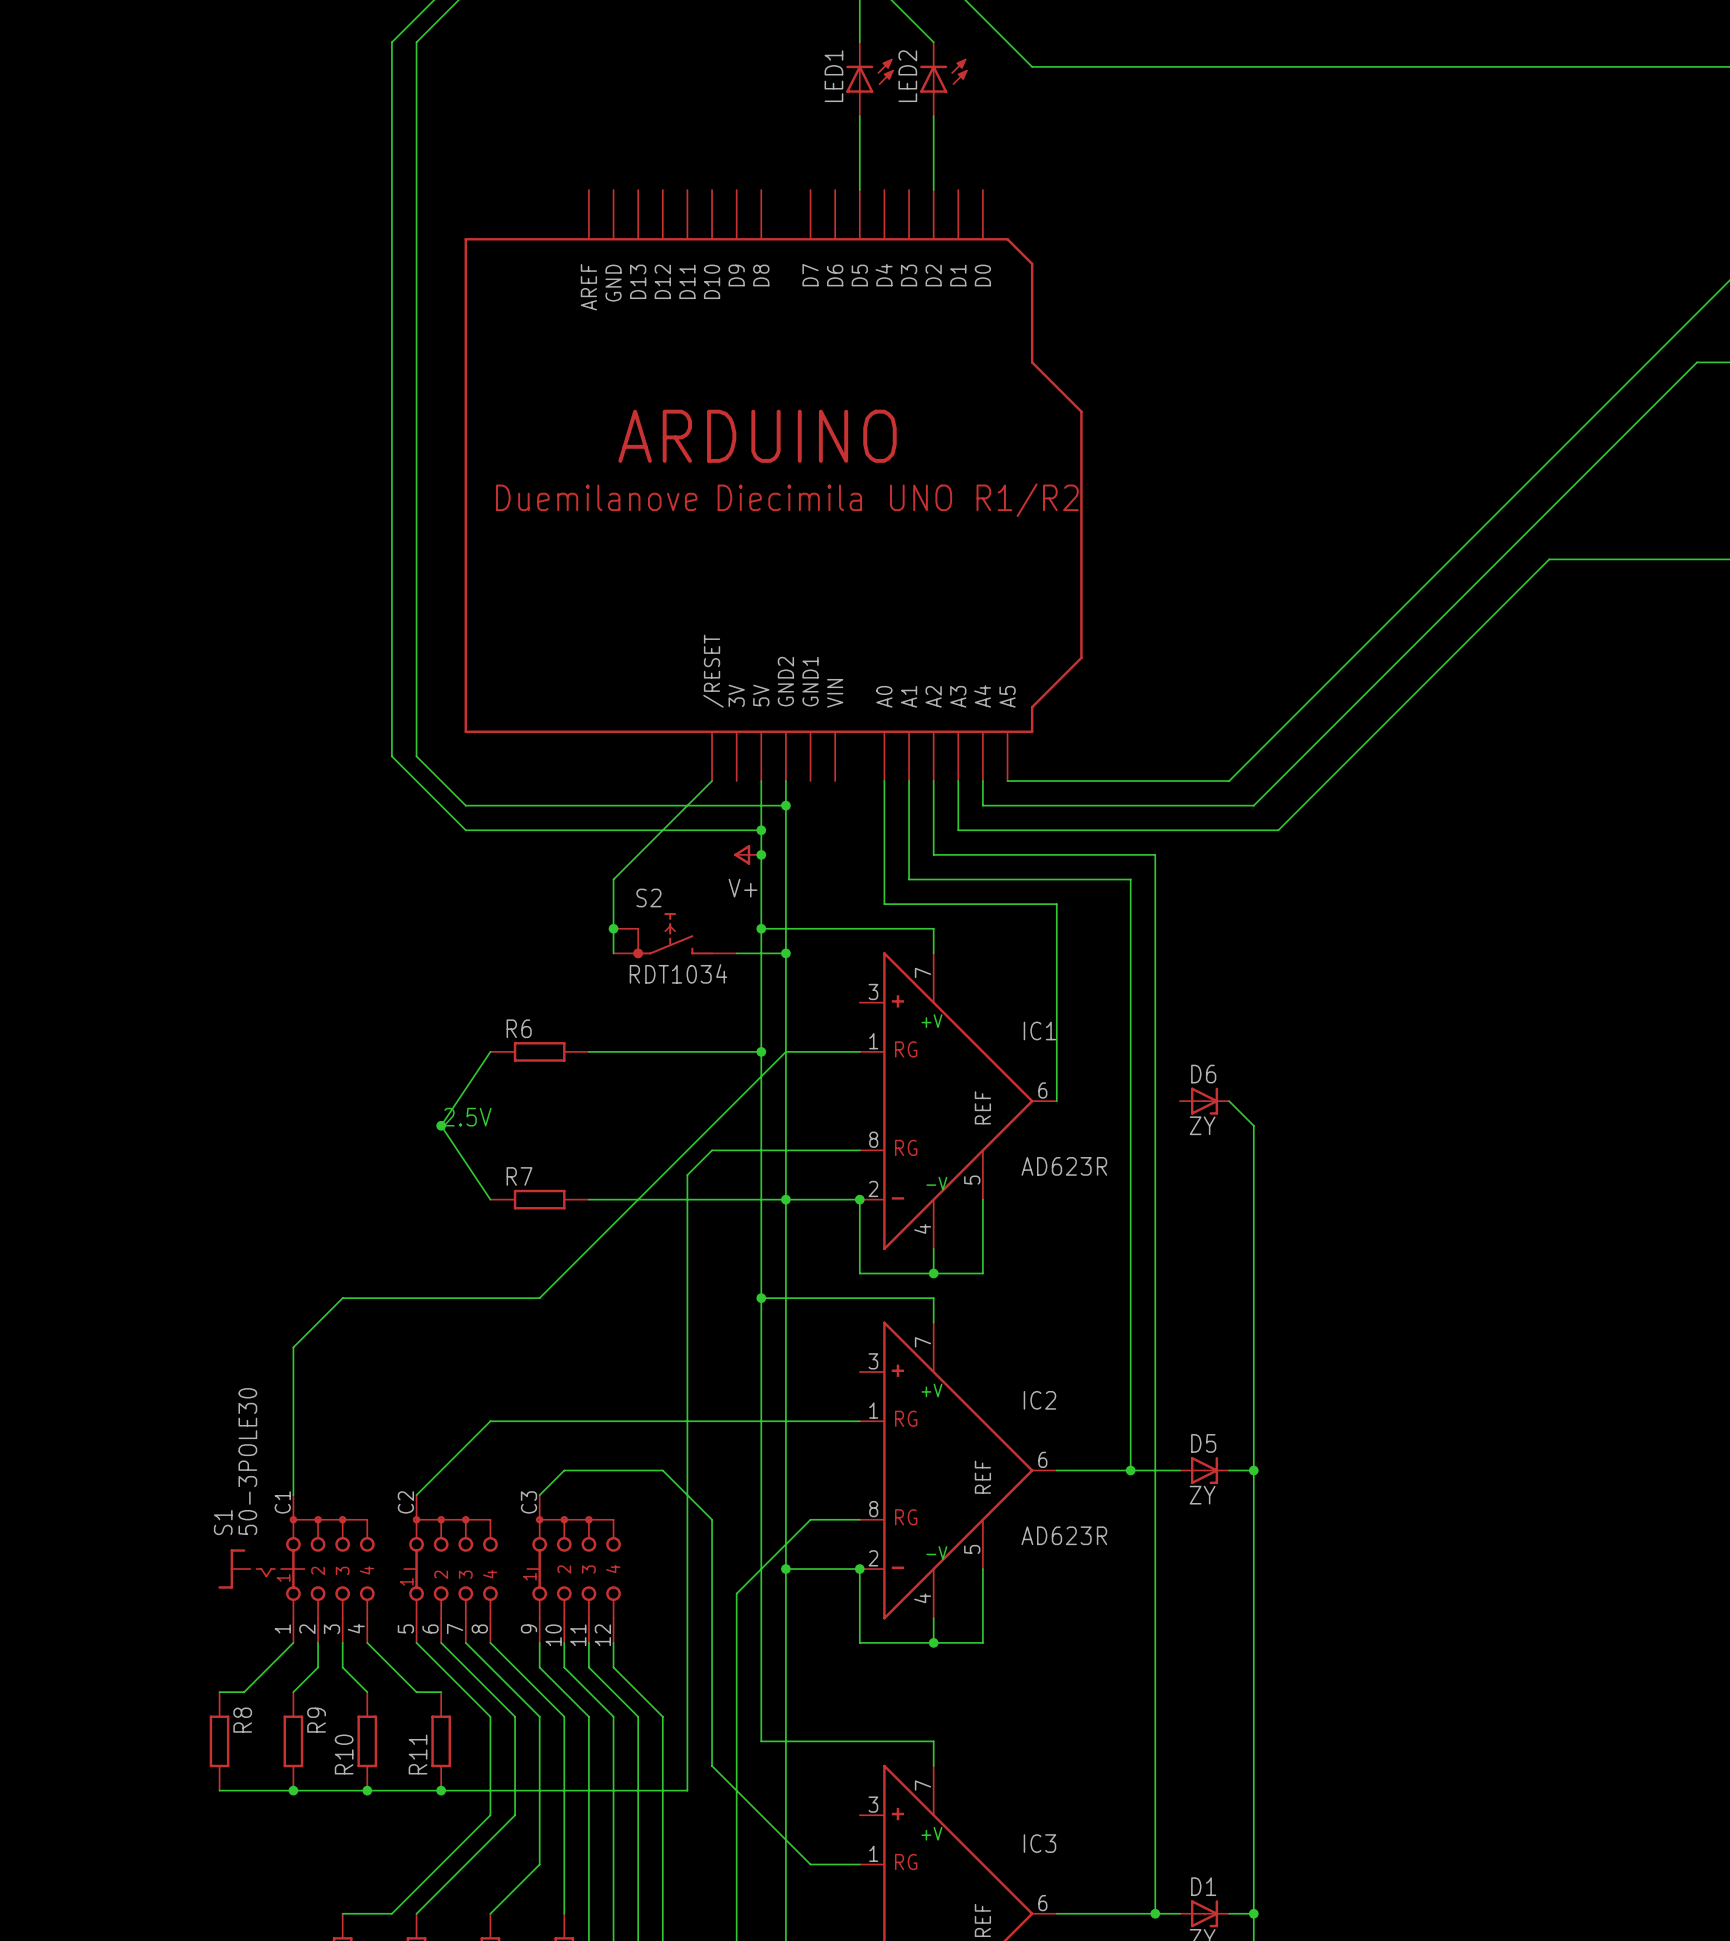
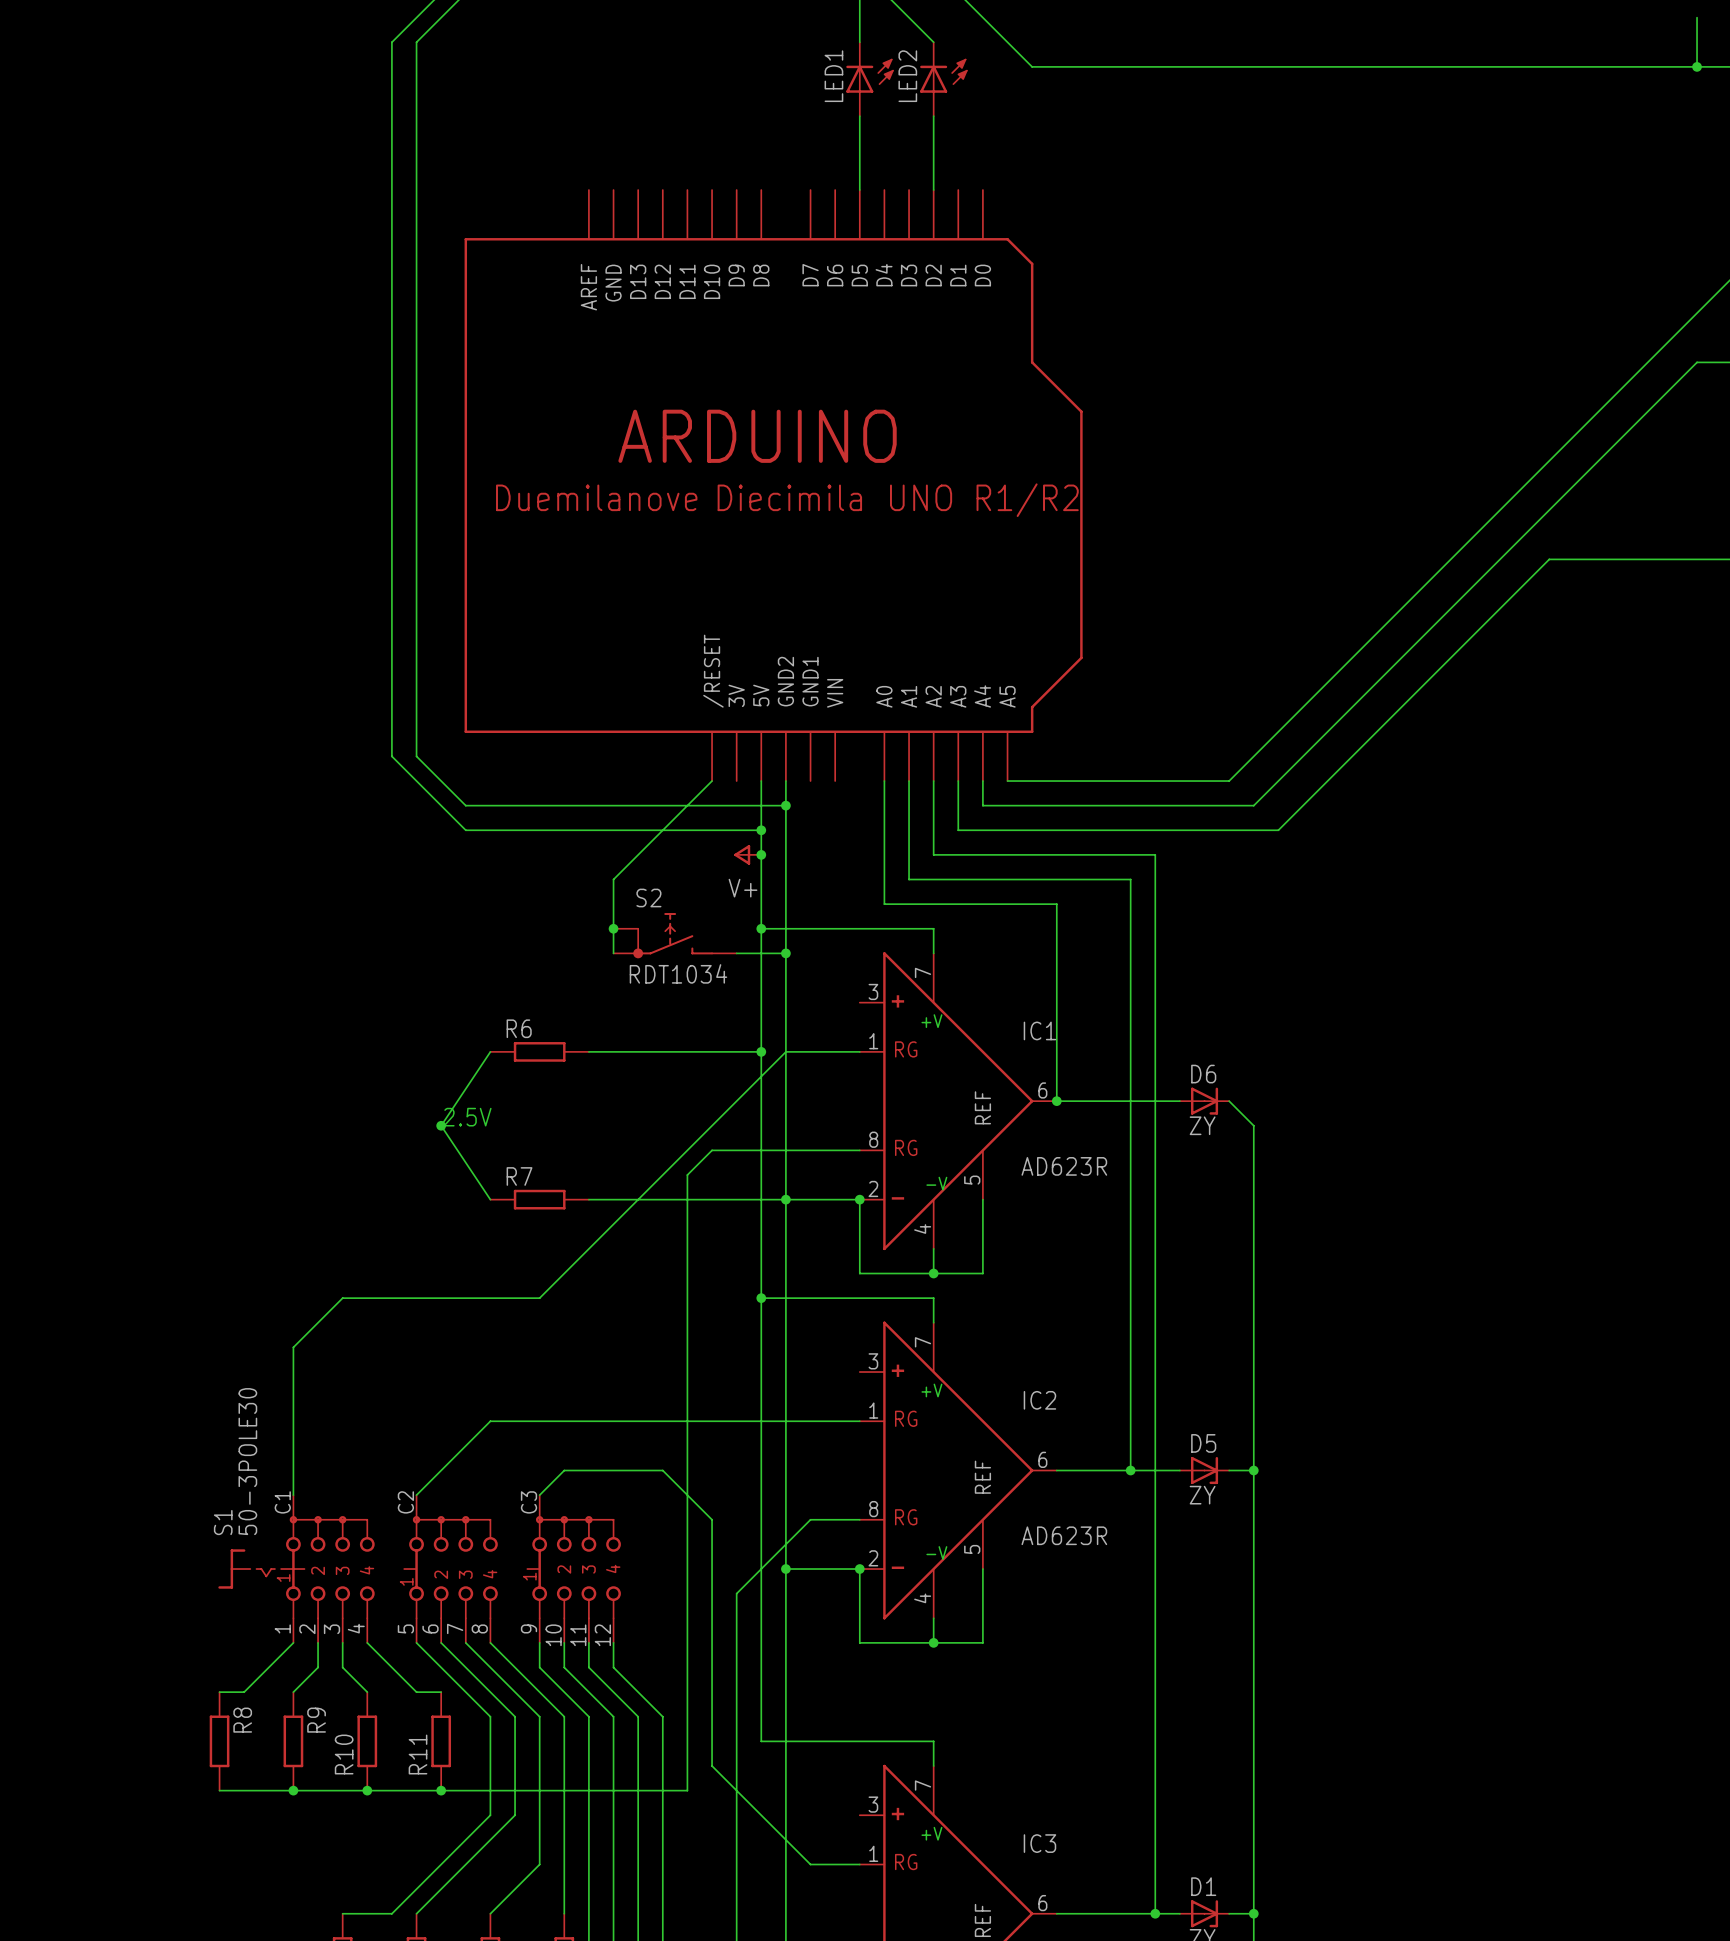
wire: none -> (1697, 17) (1697, 66)
junction: none -> (1697, 66)
wire: none -> (1056, 1101) (1179, 1101)
junction: none -> (1056, 1101)

